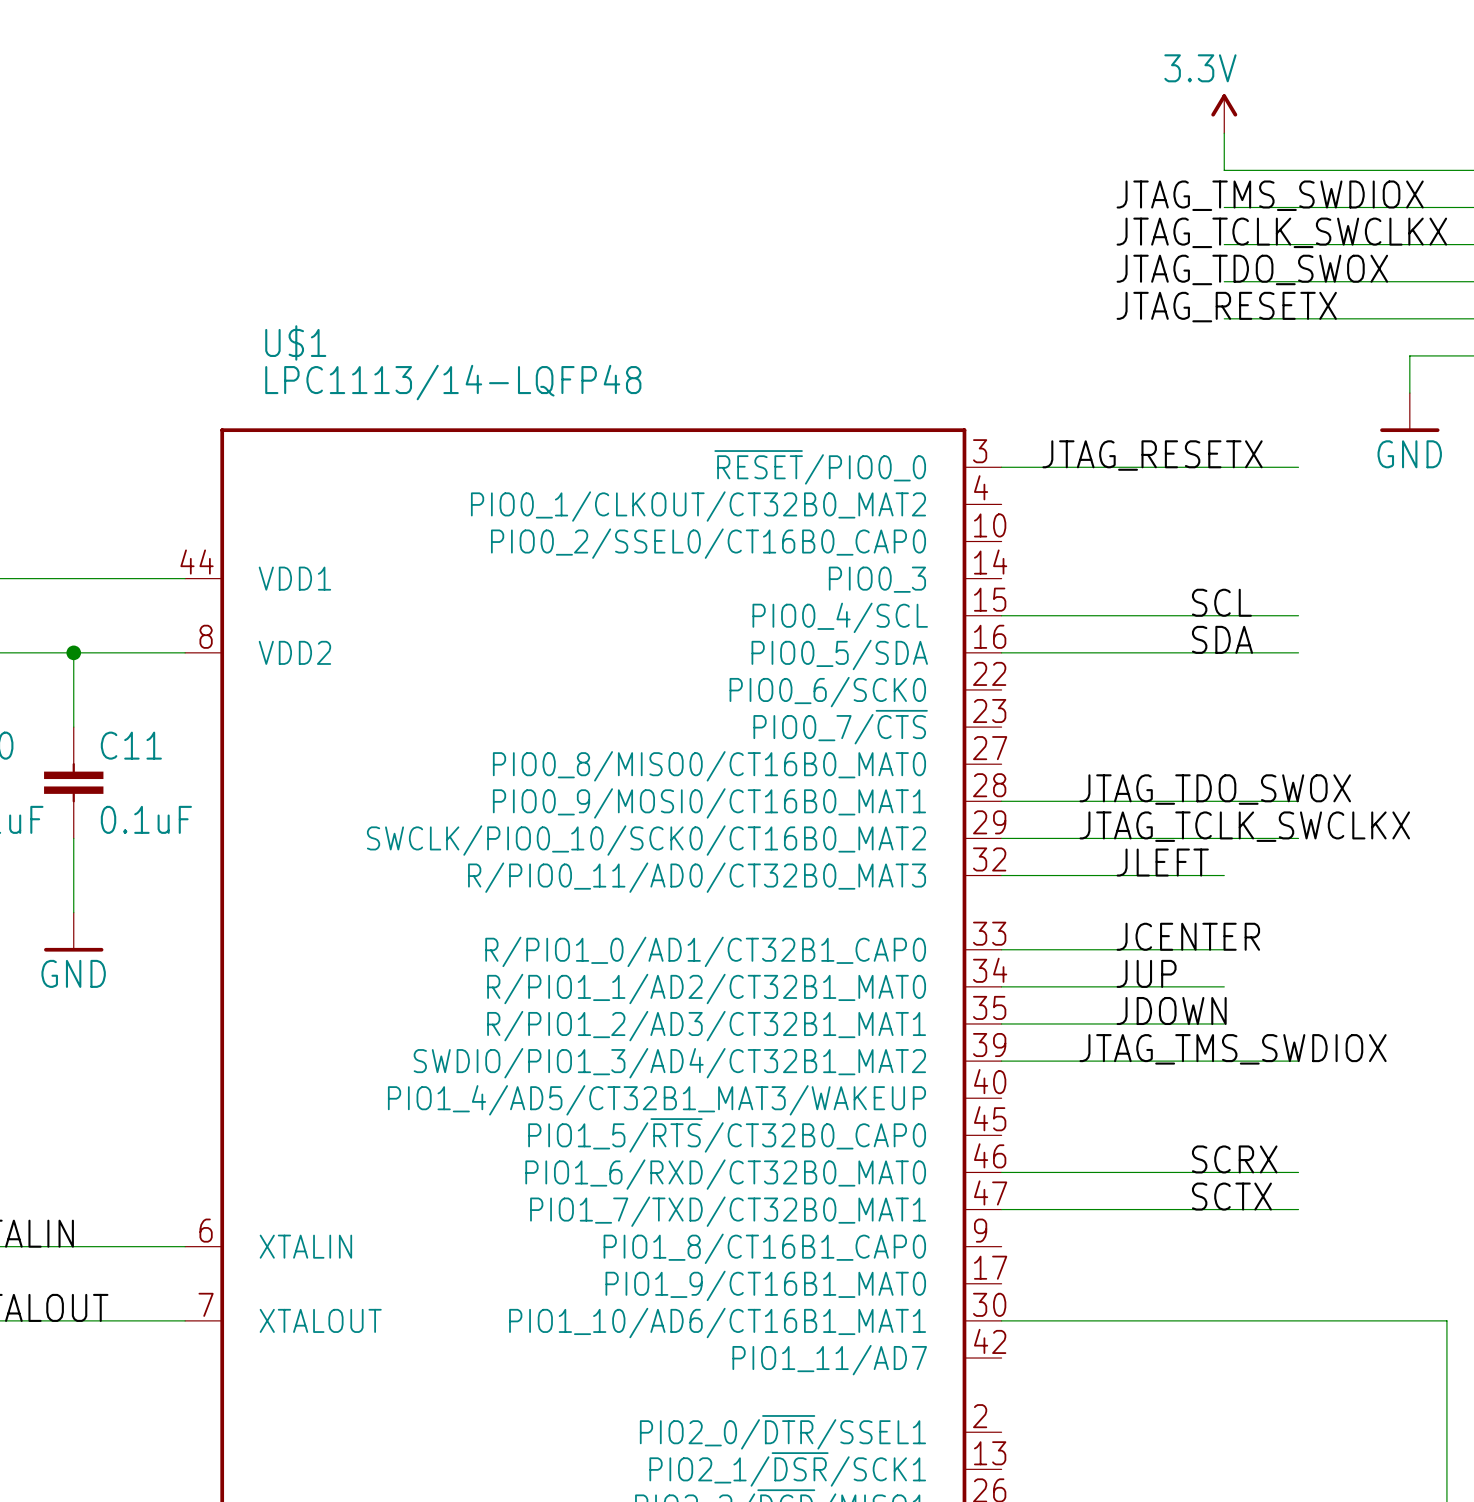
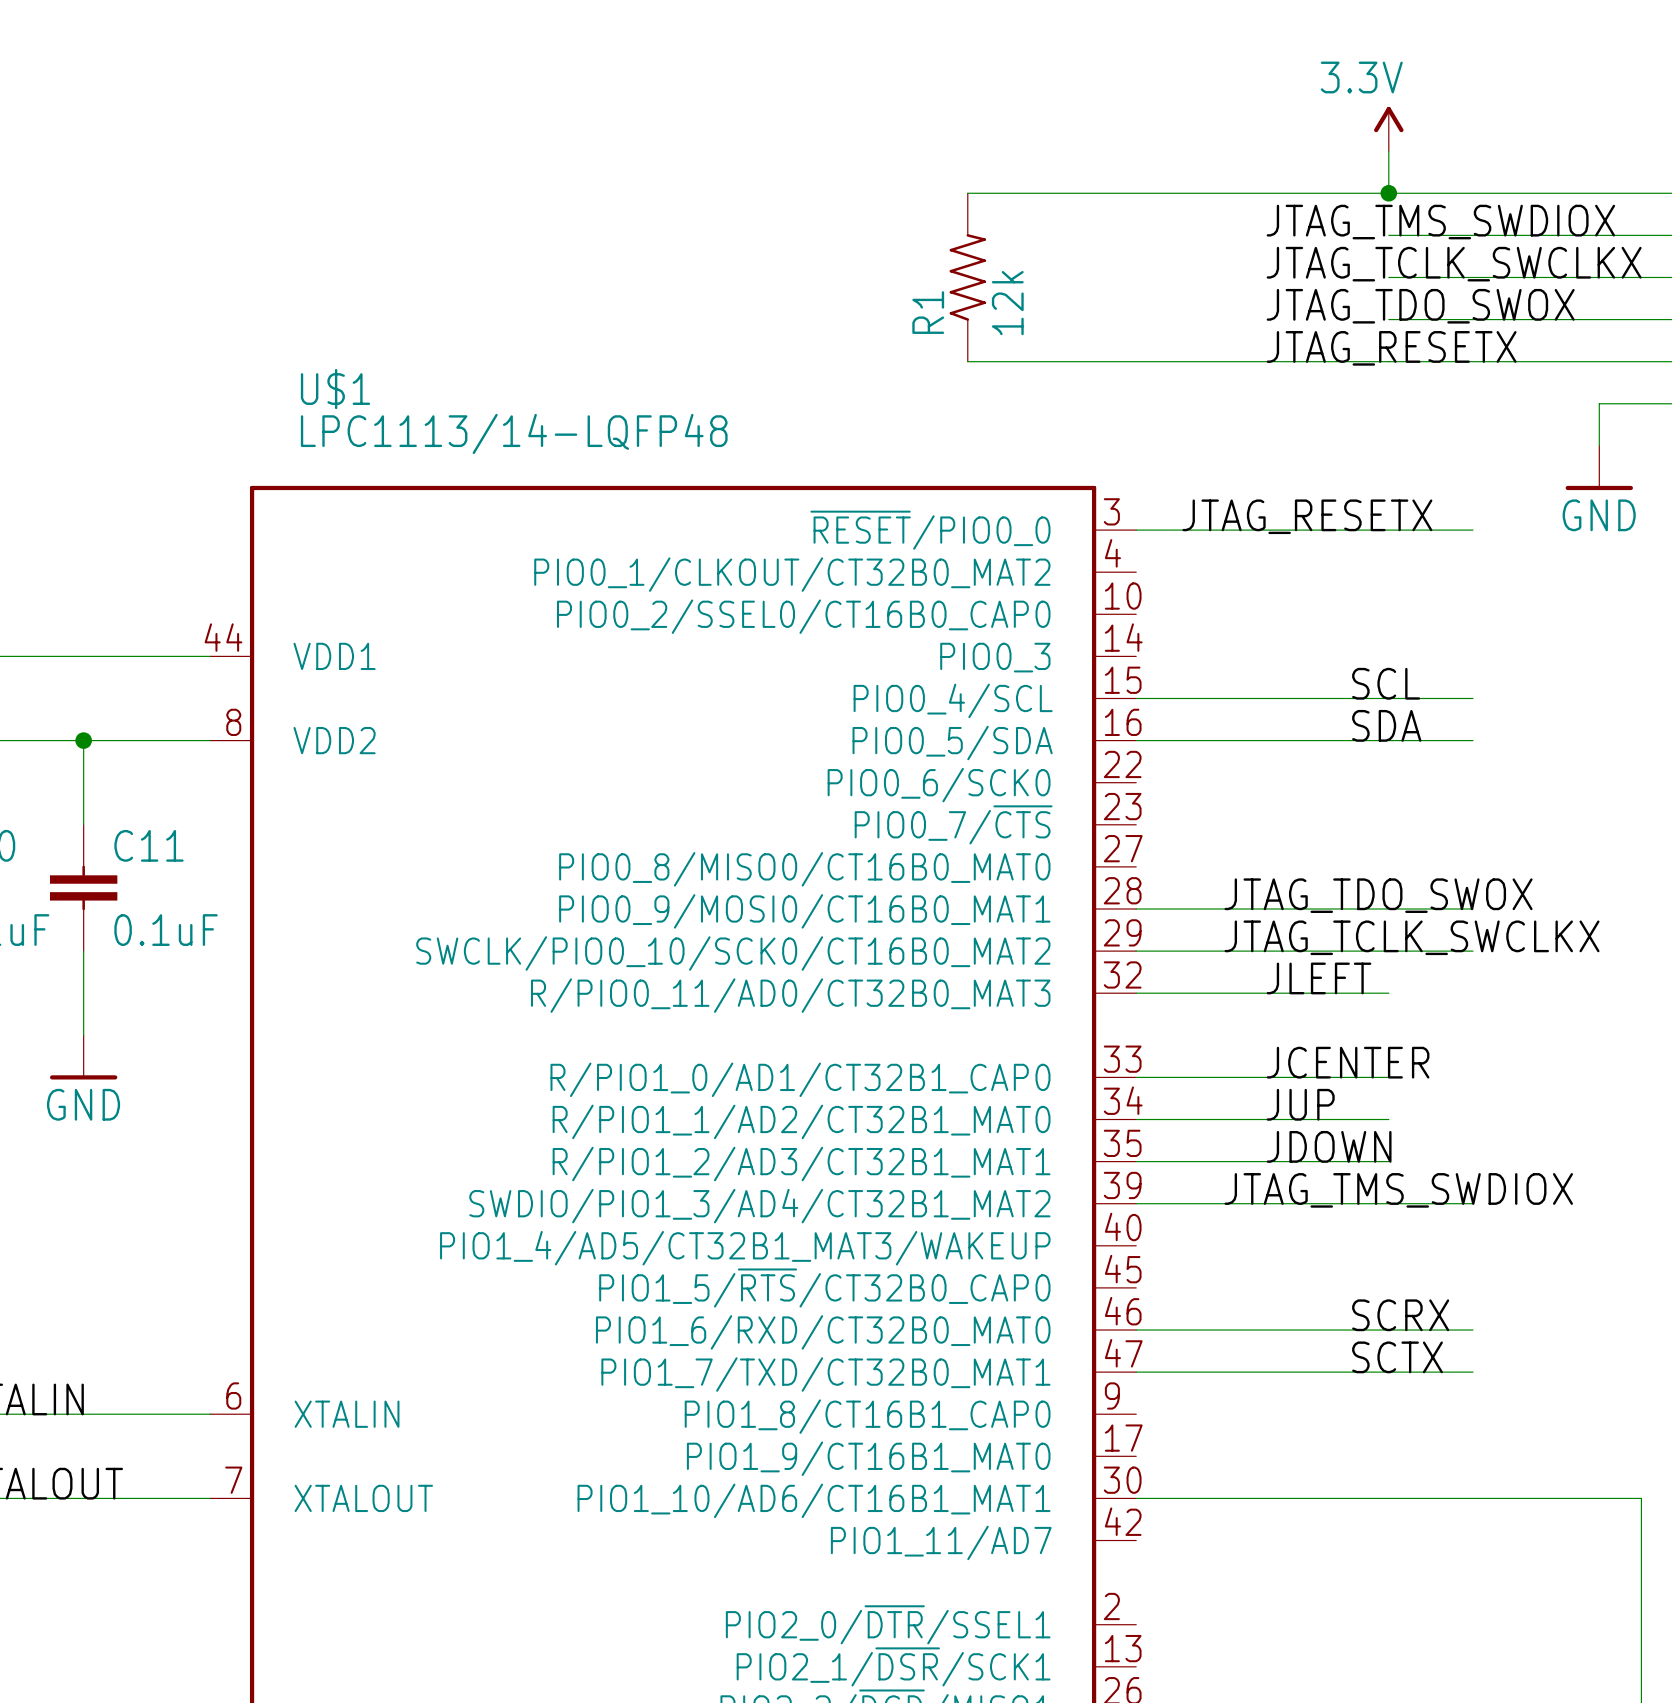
wire: none -> (967, 193) (1388, 193)
junction: none -> (1388, 193)
R1: none -> 12k (967, 277)
wire: none -> (967, 361) (1388, 361)

